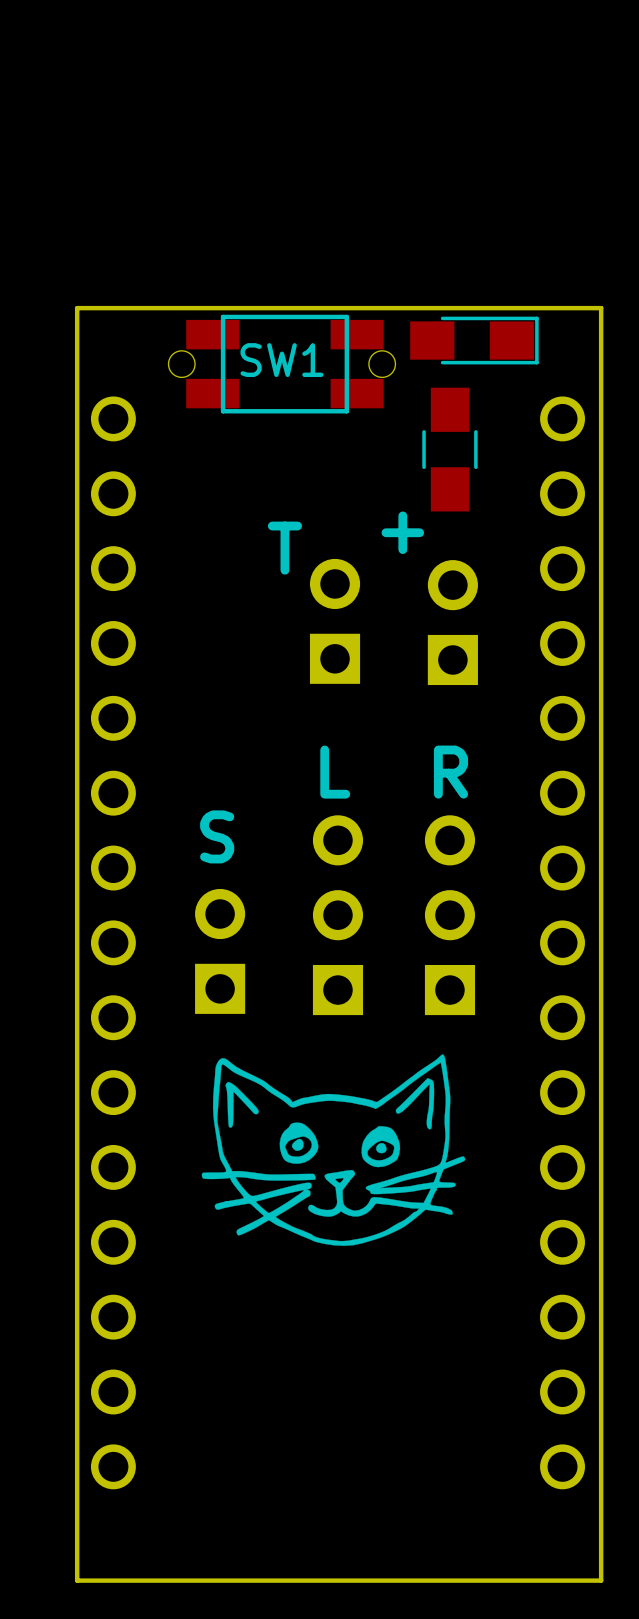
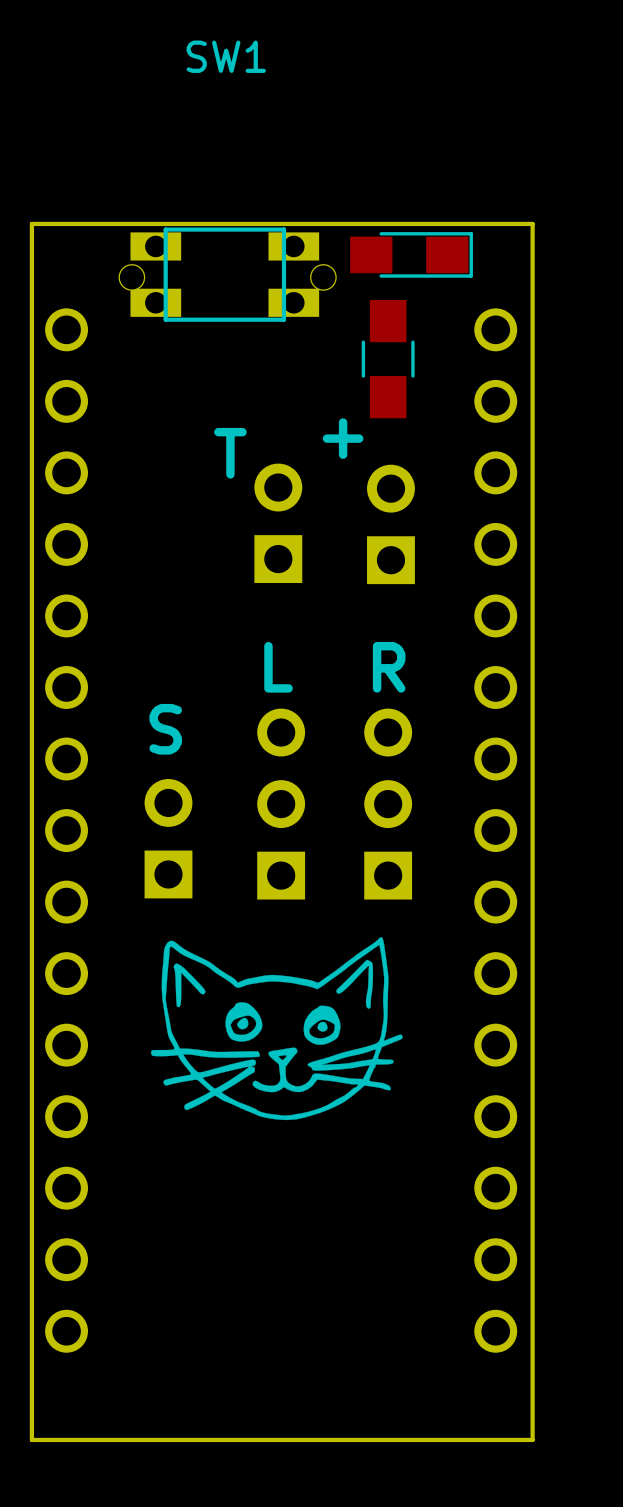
SW1 footprint: [186, 314, 384, 414] -> [130, 227, 320, 322]
SW1 name position: SW1 (281, 360) -> SW1 (226, 56)

